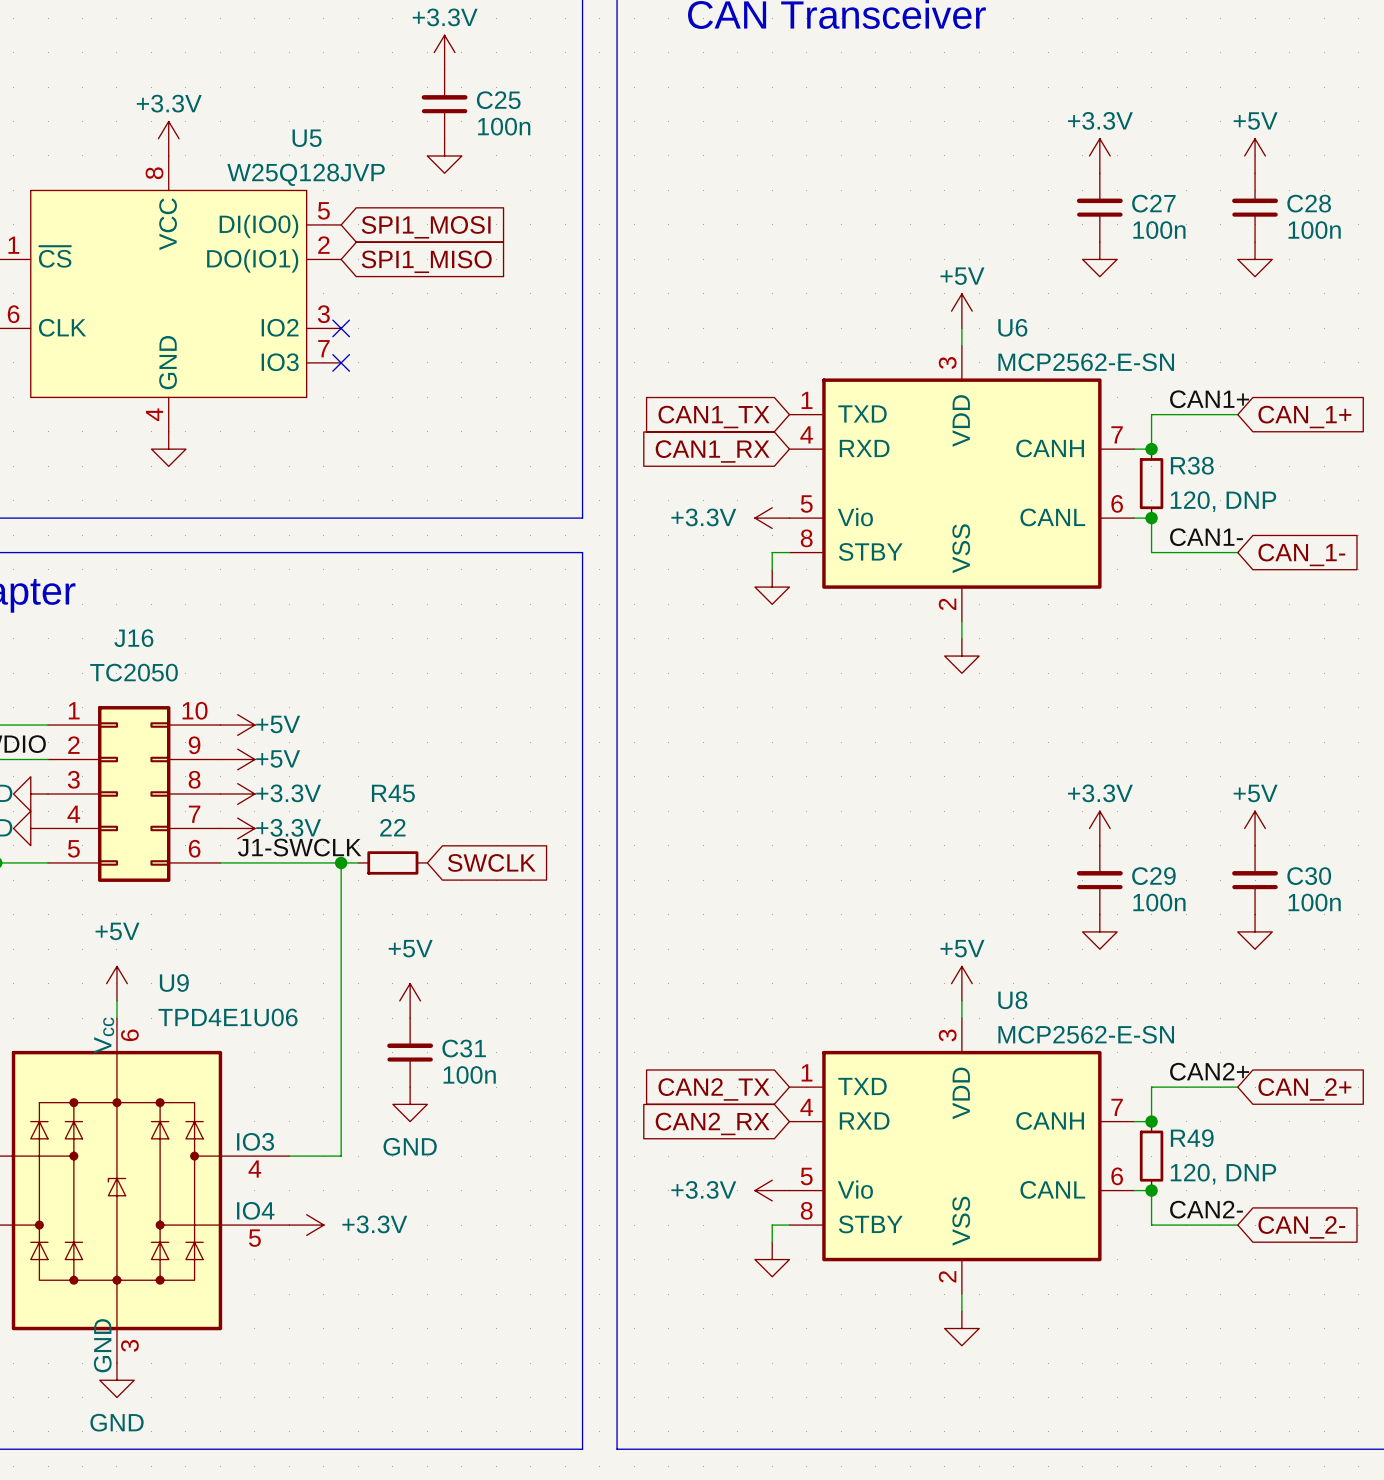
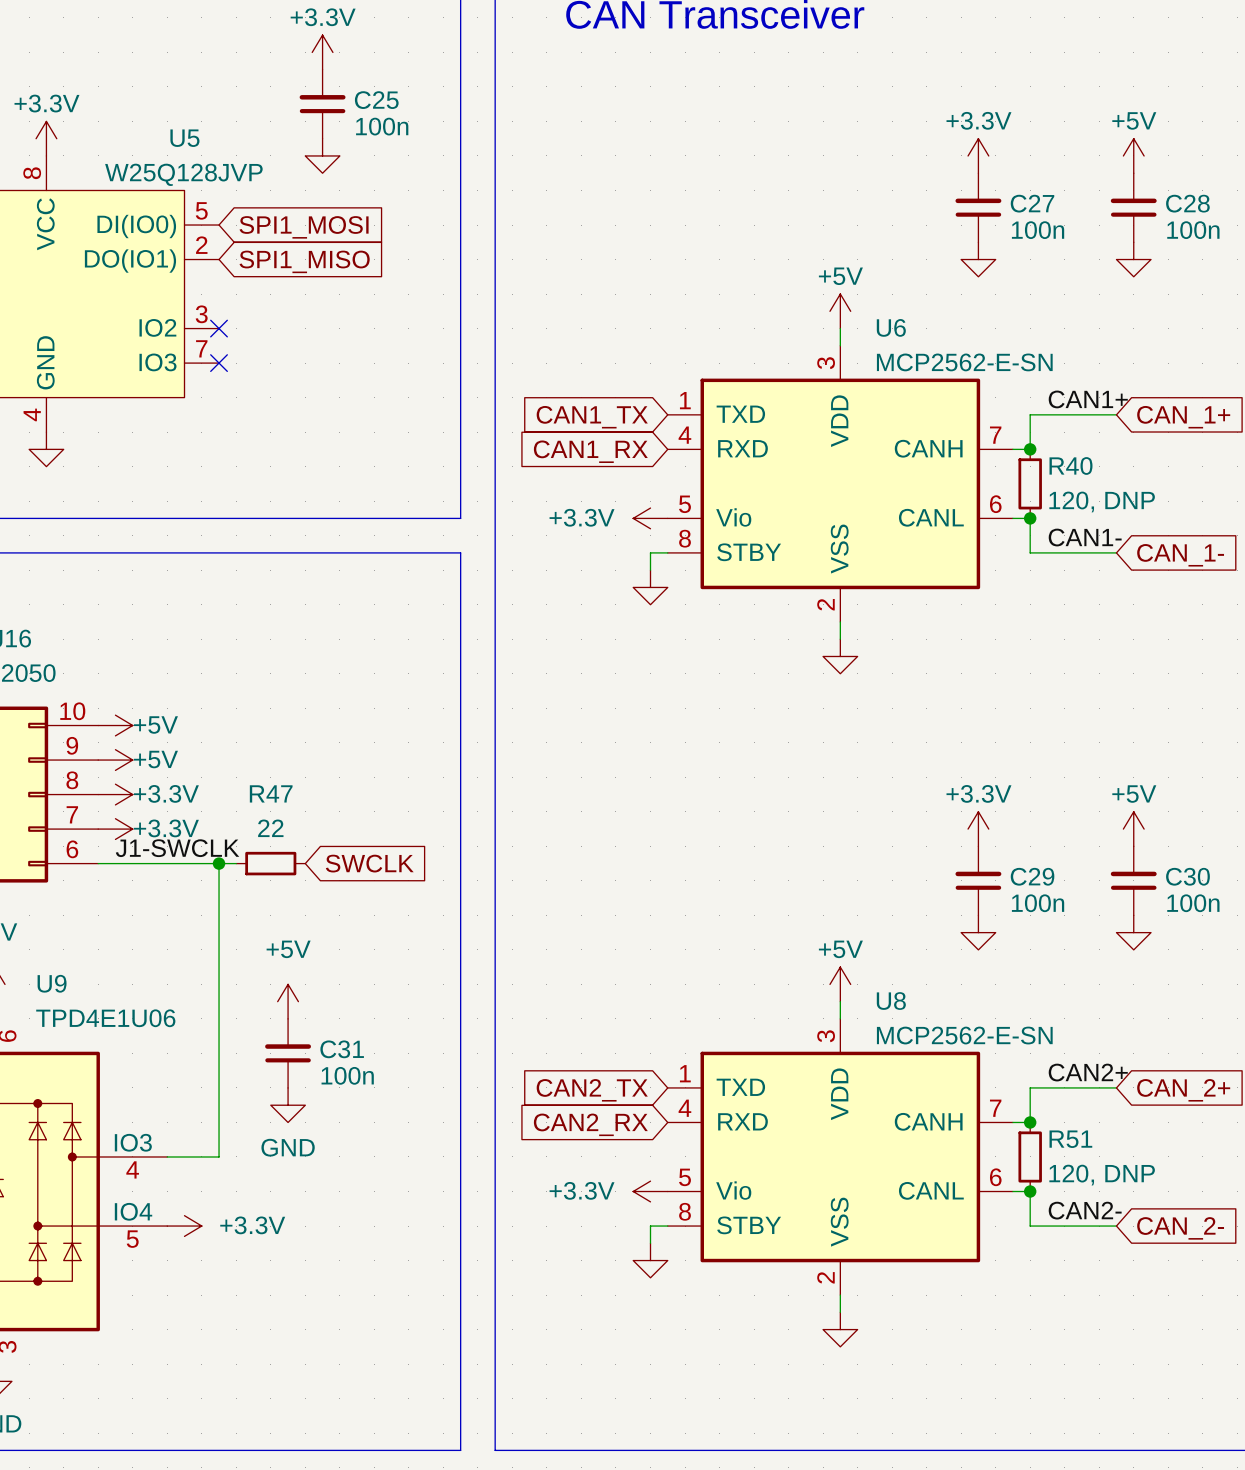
R38 name: R38 (1192, 465) -> R40 (1071, 465)
R45 name: R45 (393, 793) -> R47 (271, 793)
R49 name: R49 (1192, 1138) -> R51 (1070, 1139)

